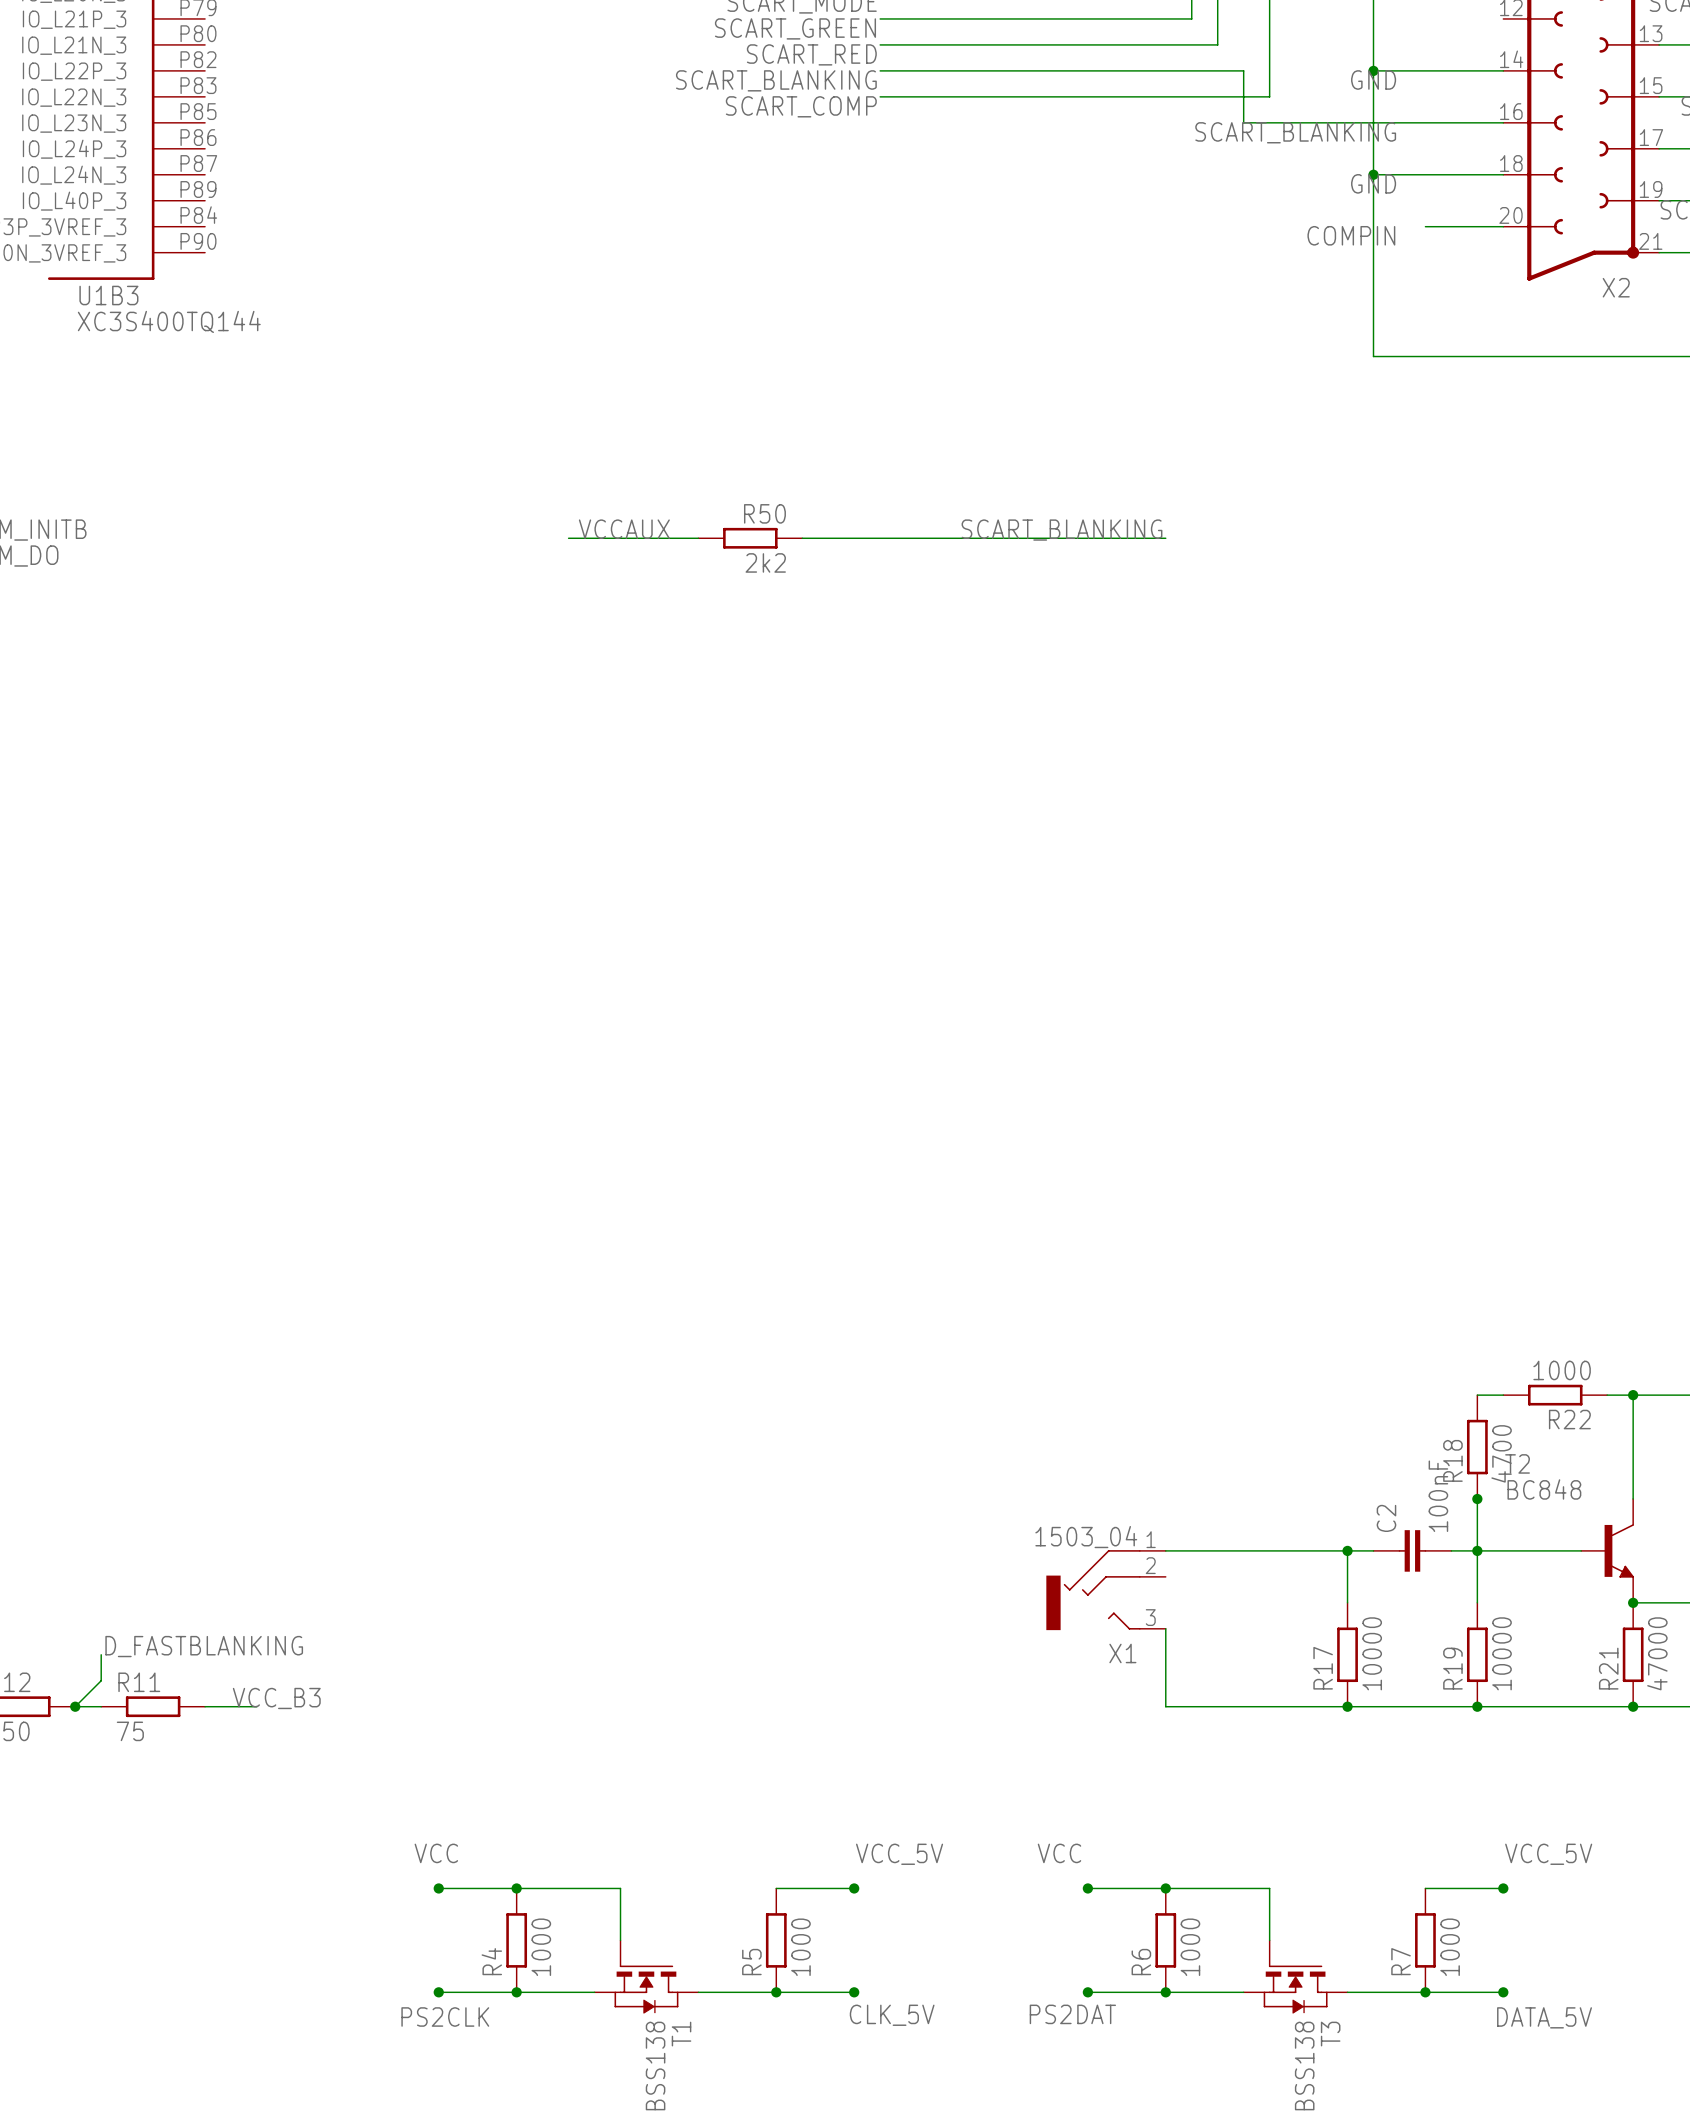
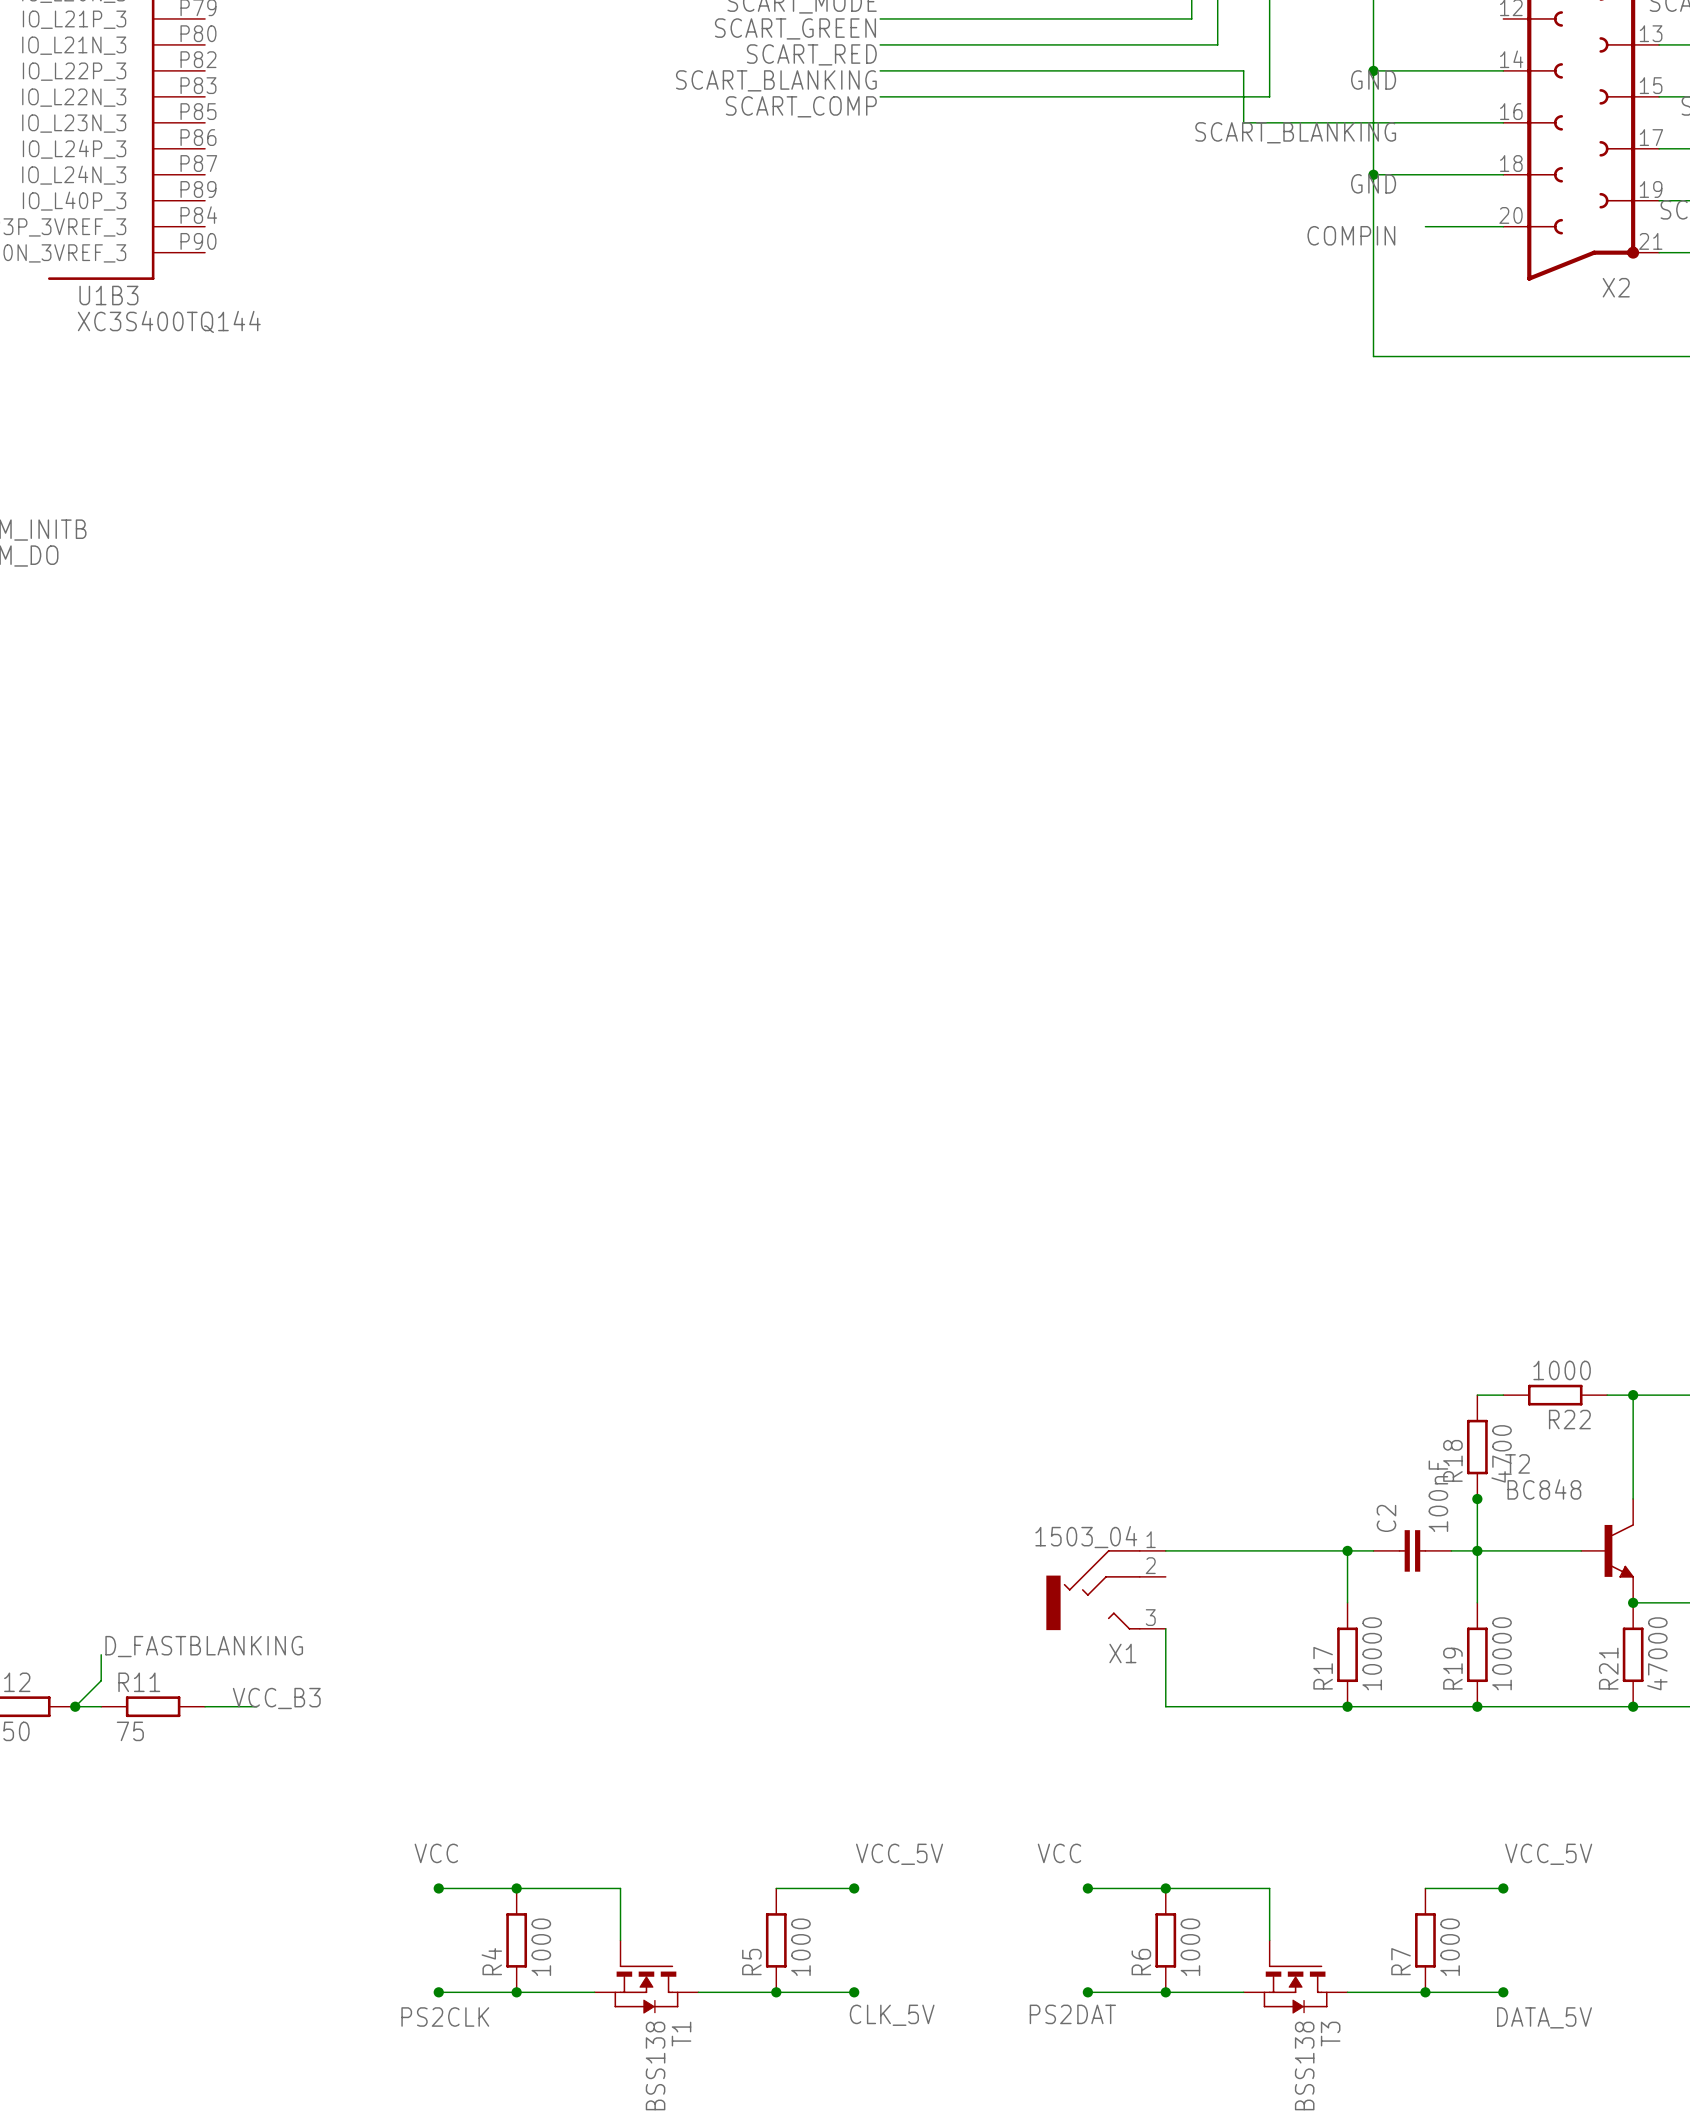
label: VCCAUX (624, 529) -> none
label: SCART_BLANKING (1062, 530) -> none
wire: (568, 538) (698, 538) -> none
R50: 2k2 (750, 538) -> none
wire: (802, 538) (1165, 538) -> none

